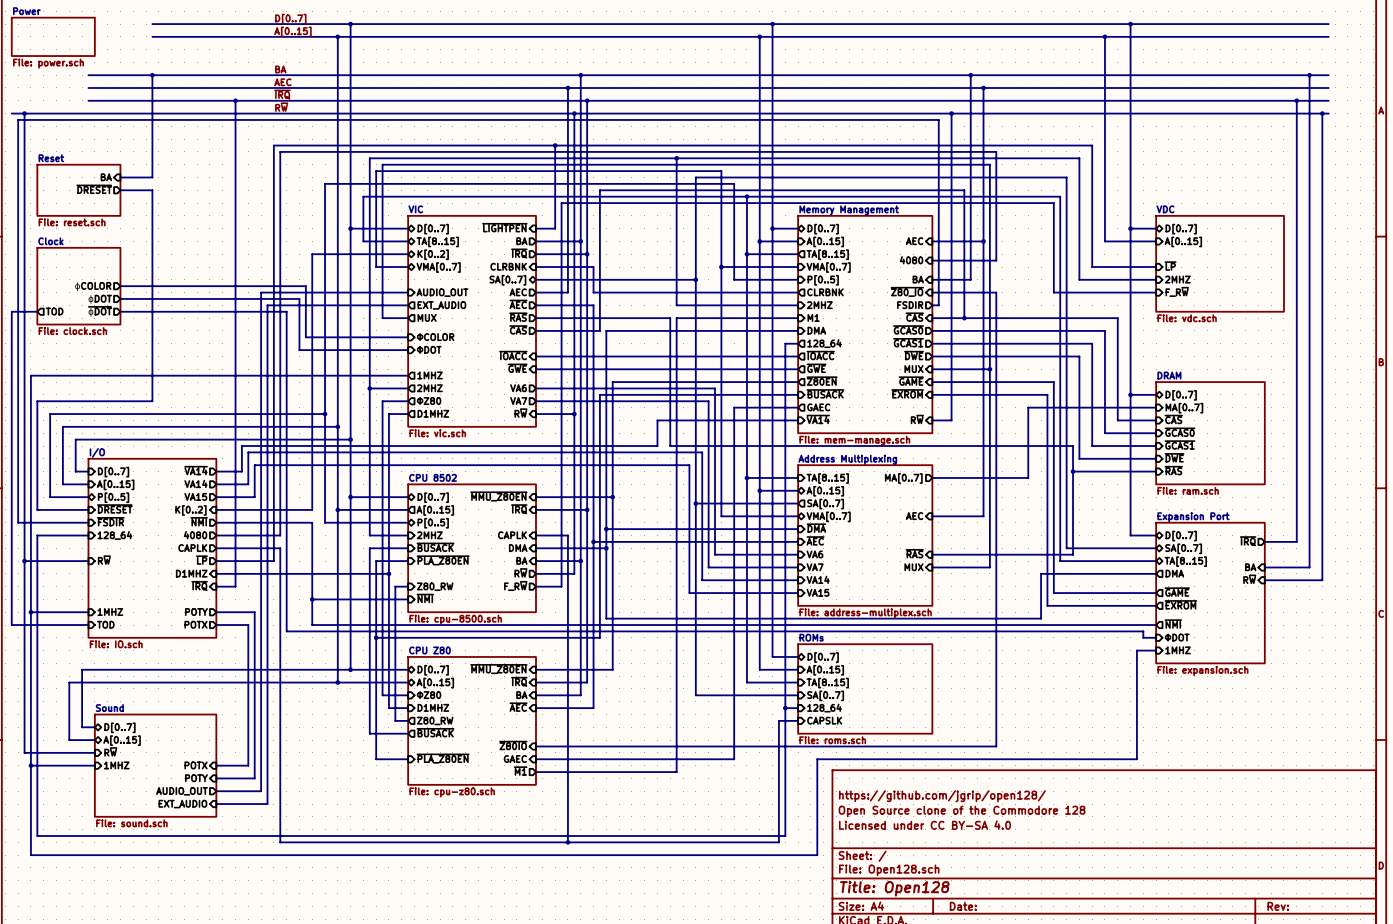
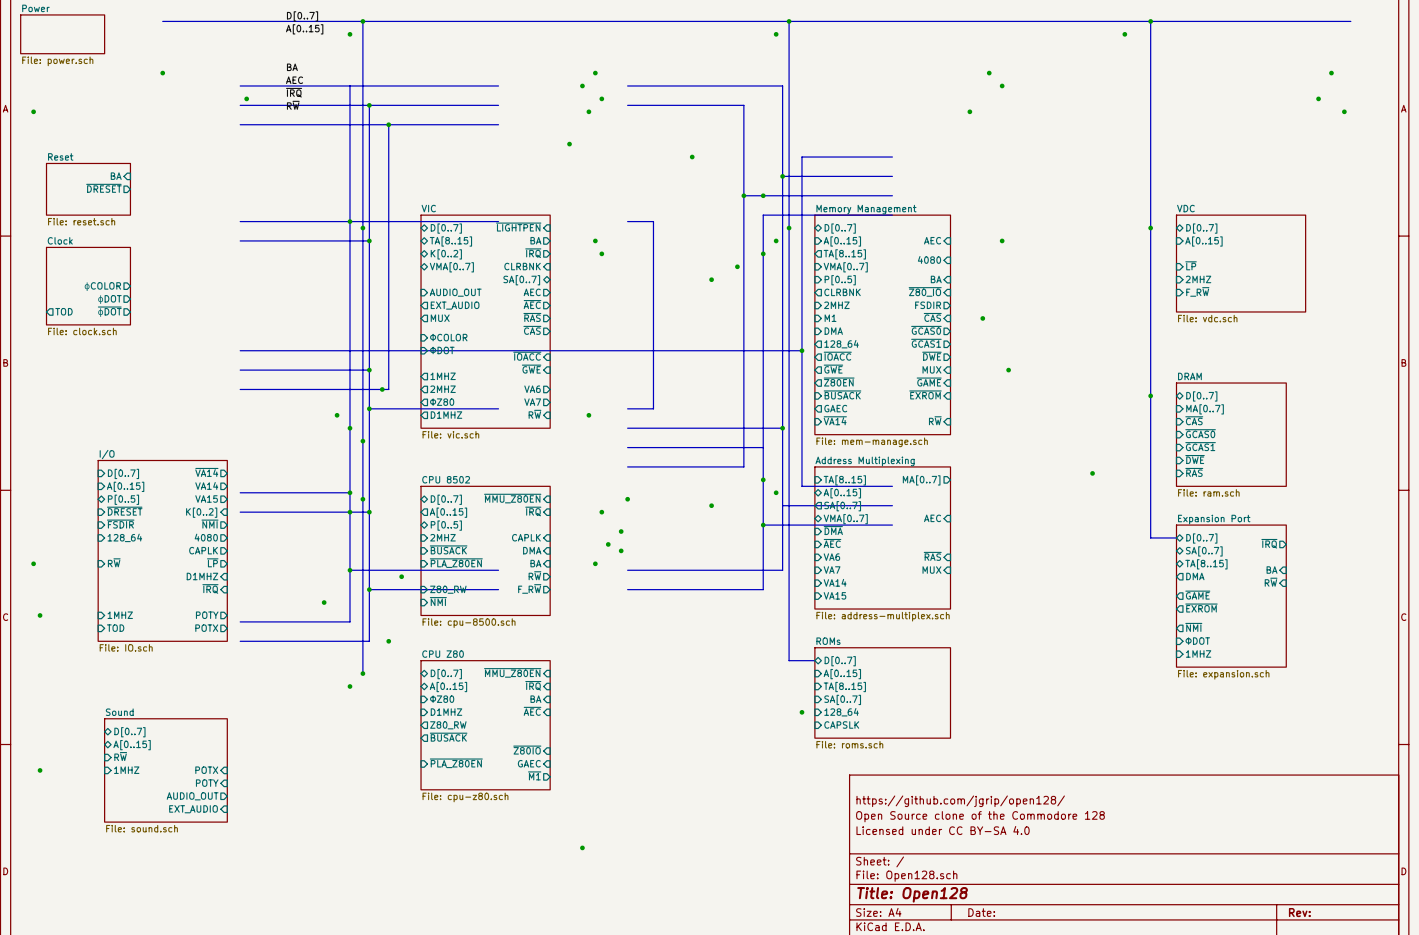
bus: (152, 36) (1328, 36) -> none
bus: (337, 36) (337, 87) -> none
bus: (759, 36) (759, 669) (798, 669) -> none
bus: (1104, 36) (1104, 241) (1156, 241) -> none
wire: (88, 75) (1328, 75) -> none
wire: (152, 75) (152, 177) (120, 177) -> none
wire: (580, 75) (580, 695) (536, 695) -> none
wire: (970, 75) (970, 279) (932, 279) -> none
wire: (1309, 75) (1309, 567) (1264, 567) -> none
wire: (88, 87) (1328, 87) -> none
bus: none -> (240, 85) (498, 85)
wire: (567, 87) (567, 292) (536, 292) -> none
bus: none -> (627, 85) (782, 85) (782, 570) (627, 570)
wire: (983, 87) (983, 516) (932, 516) -> none
wire: (88, 100) (1328, 100) -> none
wire: (235, 100) (235, 586) (216, 586) -> none
wire: (587, 100) (587, 682) (536, 682) -> none
wire: (1296, 100) (1296, 541) (1264, 541) -> none
bus: none -> (240, 105) (498, 105)
bus: none -> (369, 105) (369, 641) (240, 641)
junction: none -> (369, 105)
bus: none -> (627, 105) (743, 105) (743, 466) (627, 466)
wire: (11, 113) (1328, 113) -> none
wire: (24, 113) (24, 752) (94, 752) -> none
wire: (574, 113) (574, 573) (536, 573) -> none
wire: (951, 113) (951, 420) (932, 420) -> none
wire: (1322, 113) (1322, 580) (1264, 580) -> none
bus: none -> (240, 124) (498, 124)
junction: none -> (388, 124)
wire: (555, 145) (555, 228) (536, 228) -> none
wire: (676, 158) (676, 305) (798, 305) -> none
bus: none -> (892, 157) (801, 157) (801, 486) (892, 486)
bus: (376, 171) (721, 171) (721, 516) (798, 516) -> (388, 169) (388, 124)
bus: (766, 177) (695, 177) (695, 695) (798, 695) -> none
junction: none -> (782, 176)
bus: (874, 177) (1066, 177) (1066, 548) (1156, 548) -> none
wire: (120, 190) (152, 190) (152, 401) (37, 401) (37, 509) (88, 509) -> none
bus: (727, 196) (363, 196) (363, 241) (408, 241) -> none
junction: none -> (743, 195)
bus: (746, 196) (746, 215) -> (892, 215) (763, 215)
bus: (874, 196) (1060, 196) (1060, 561) (1156, 561) -> none
bus: none -> (240, 221) (498, 221)
junction: none -> (349, 221)
bus: none -> (627, 221) (653, 221) (653, 408) (627, 408)
bus: (350, 228) (408, 228) -> none
bus: (772, 228) (798, 228) -> none
bus: (1130, 228) (1156, 228) -> none
bus: none -> (240, 240) (369, 240)
junction: none -> (369, 240)
wire: (536, 241) (580, 241) -> none
bus: (759, 241) (798, 241) -> none
wire: (932, 241) (983, 241) -> none
bus: (408, 254) (312, 254) (312, 509) -> (349, 512) (324, 512)
wire: (536, 254) (587, 254) -> none
bus: (746, 254) (798, 254) -> none
wire: (932, 260) (996, 260) (996, 151) (280, 151) (280, 535) (216, 535) -> none
bus: (376, 267) (408, 267) -> (388, 266) (388, 389) (240, 389)
wire: (536, 267) (593, 267) (593, 292) (798, 292) -> none
bus: (721, 267) (798, 267) -> none
wire: (1156, 267) (1092, 267) (1092, 145) (273, 145) (273, 561) (216, 561) -> none
bus: (536, 279) (695, 279) -> none
bus: (798, 279) (734, 279) (734, 183) (325, 183) (325, 522) (408, 522) -> none
wire: (1156, 279) (1079, 279) (1079, 158) (369, 158) (369, 535) (408, 535) -> none
wire: (120, 286) (305, 286) (305, 337) (408, 337) -> none
wire: (408, 292) (261, 292) (261, 791) (216, 791) -> none
wire: (932, 292) (996, 292) (996, 746) (536, 746) -> none
wire: (1156, 292) (1053, 292) (1053, 203) (561, 203) (561, 586) (536, 586) -> none
wire: (120, 298) (299, 298) (299, 350) (408, 350) -> none
wire: (408, 305) (267, 305) (267, 804) (216, 804) -> none
wire: (536, 305) (593, 305) (593, 708) (536, 708) -> none
wire: (932, 305) (938, 305) (938, 119) (18, 119) (18, 522) (88, 522) -> none
wire: (37, 311) (11, 311) (11, 625) (88, 625) -> none
wire: (120, 311) (286, 311) (286, 631) (1143, 631) (1143, 637) (1156, 637) -> none
wire: (408, 318) (382, 318) (382, 164) (989, 164) (989, 567) (932, 567) -> none
wire: (536, 318) (670, 318) (670, 446) (1073, 446) (1073, 554) (932, 554) -> none
wire: (798, 318) (676, 318) (676, 772) (536, 772) -> none
wire: (932, 318) (1117, 318) (1117, 420) (1156, 420) -> none
wire: (964, 318) (964, 190) (599, 190) (599, 330) (536, 330) -> none
wire: (798, 330) (606, 330) (606, 618) (1041, 618) (1041, 573) (1156, 573) -> none
wire: (932, 330) (1104, 330) (1104, 433) (1156, 433) -> none
wire: (798, 343) (785, 343) (785, 835) (37, 835) (37, 535) (88, 535) -> none
wire: (932, 343) (1092, 343) (1092, 446) (1156, 446) -> none
bus: none -> (240, 350) (801, 350)
junction: none -> (801, 350)
wire: (536, 356) (798, 356) -> none
wire: (932, 356) (1079, 356) (1079, 458) (1156, 458) -> none
bus: none -> (240, 370) (369, 370)
junction: none -> (369, 370)
wire: (536, 369) (798, 369) -> none
wire: (932, 369) (989, 369) -> none
wire: (408, 375) (30, 375) (30, 855) (817, 855) (817, 759) (1136, 759) (1136, 650) (1156, 650) -> none
wire: (798, 382) (612, 382) (612, 669) (536, 669) -> none
wire: (932, 382) (1053, 382) (1053, 593) (1156, 593) -> none
wire: (369, 388) (408, 388) -> none
wire: (536, 388) (715, 388) (715, 554) (798, 554) -> none
wire: (798, 394) (599, 394) (599, 637) (376, 637) -> none
wire: (932, 394) (1047, 394) (1047, 605) (1156, 605) -> none
bus: (1130, 394) (1156, 394) -> none
wire: (408, 401) (382, 401) (382, 695) (408, 695) -> none
wire: (536, 401) (708, 401) (708, 567) (798, 567) -> none
bus: none -> (369, 408) (498, 408)
junction: none -> (369, 408)
wire: (798, 407) (734, 407) (734, 759) (536, 759) -> none
bus: (1156, 407) (1028, 407) (1028, 477) (932, 477) -> none
bus: (325, 414) (50, 414) (50, 497) (88, 497) -> none
wire: (408, 414) (388, 414) (388, 708) (408, 708) -> none
wire: (536, 414) (574, 414) -> none
wire: (798, 420) (657, 420) (657, 446) (241, 446) (241, 471) (216, 471) -> none
bus: (337, 426) (62, 426) (62, 484) (88, 484) -> none
bus: none -> (627, 428) (782, 428)
junction: none -> (782, 428)
bus: (350, 439) (75, 439) (75, 471) (88, 471) -> none
bus: none -> (627, 447) (763, 447)
wire: (1073, 471) (1156, 471) -> none
bus: (746, 477) (798, 477) -> none
wire: (216, 484) (248, 484) (248, 452) (702, 452) (702, 580) (798, 580) -> none
bus: none -> (240, 492) (349, 492)
junction: none -> (349, 492)
bus: (759, 490) (798, 490) -> none
wire: (216, 497) (254, 497) (254, 465) (689, 465) (689, 593) (798, 593) -> none
bus: (350, 497) (408, 497) -> none
wire: (536, 497) (612, 497) -> none
bus: (695, 503) (766, 503) -> none
bus: none -> (814, 505) (892, 505)
bus: (216, 509) (229, 509) -> none
bus: (356, 509) (408, 509) -> none
junction: none -> (369, 512)
wire: (536, 509) (587, 509) -> none
wire: (216, 522) (312, 522) (312, 625) (1156, 625) -> none
bus: none -> (763, 525) (892, 525)
junction: none -> (763, 525)
wire: (606, 529) (798, 529) -> none
wire: (536, 535) (567, 535) (567, 842) -> none
wire: (593, 541) (798, 541) -> none
wire: (216, 548) (280, 548) (280, 842) (778, 842) (778, 720) (798, 720) -> none
wire: (408, 548) (369, 548) (369, 733) (408, 733) -> none
wire: (536, 548) (606, 548) -> none
wire: (24, 561) (88, 561) -> none
wire: (408, 561) (376, 561) (376, 759) (408, 759) -> none
wire: (536, 561) (580, 561) -> none
bus: none -> (349, 570) (498, 570)
junction: none -> (349, 570)
wire: (216, 573) (388, 573) -> none
bus: none -> (369, 589) (498, 589)
junction: none -> (369, 589)
wire: (408, 586) (395, 586) (395, 720) (408, 720) -> none
bus: (746, 586) (746, 682) (798, 682) -> (763, 589) (627, 589)
wire: (312, 599) (408, 599) -> none
wire: (30, 612) (88, 612) -> none
wire: (216, 612) (254, 612) (254, 778) (216, 778) -> none
bus: (337, 618) (337, 682) -> (349, 621) (240, 621)
wire: (216, 625) (248, 625) (248, 765) (216, 765) -> none
bus: (408, 669) (82, 669) (82, 727) (94, 727) -> none
bus: (408, 682) (69, 682) (69, 740) (94, 740) -> none
wire: (785, 708) (798, 708) -> none
wire: (30, 765) (94, 765) -> none

